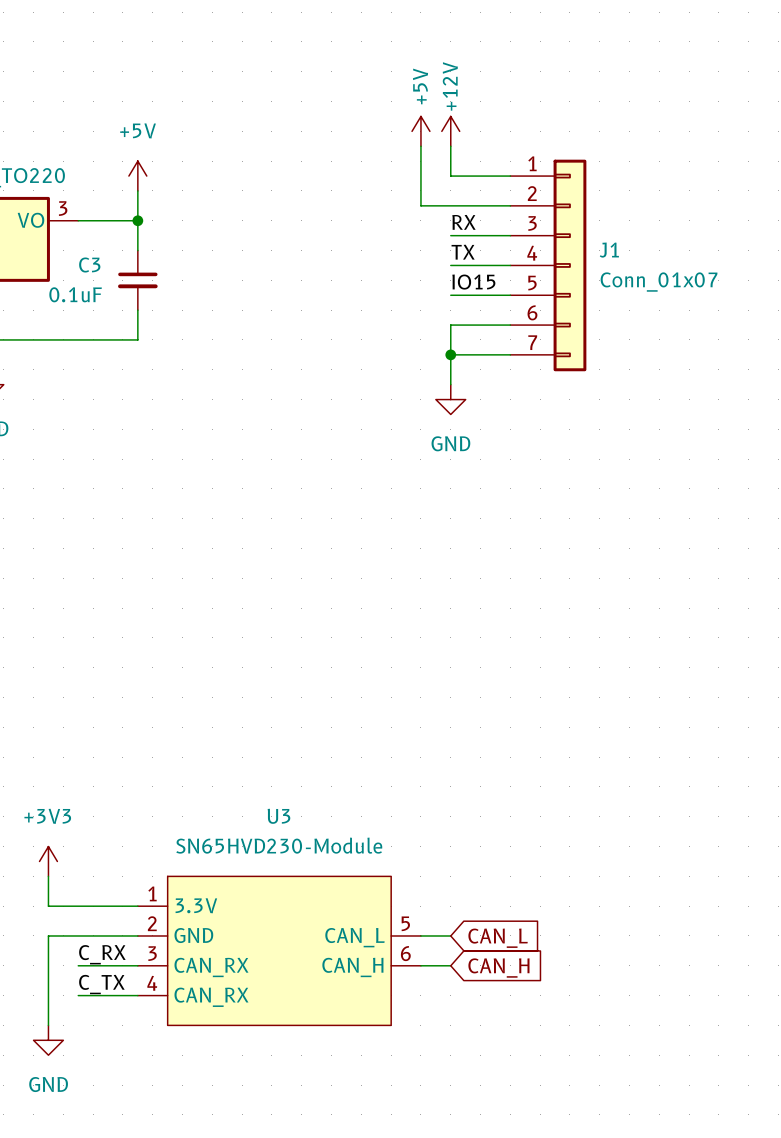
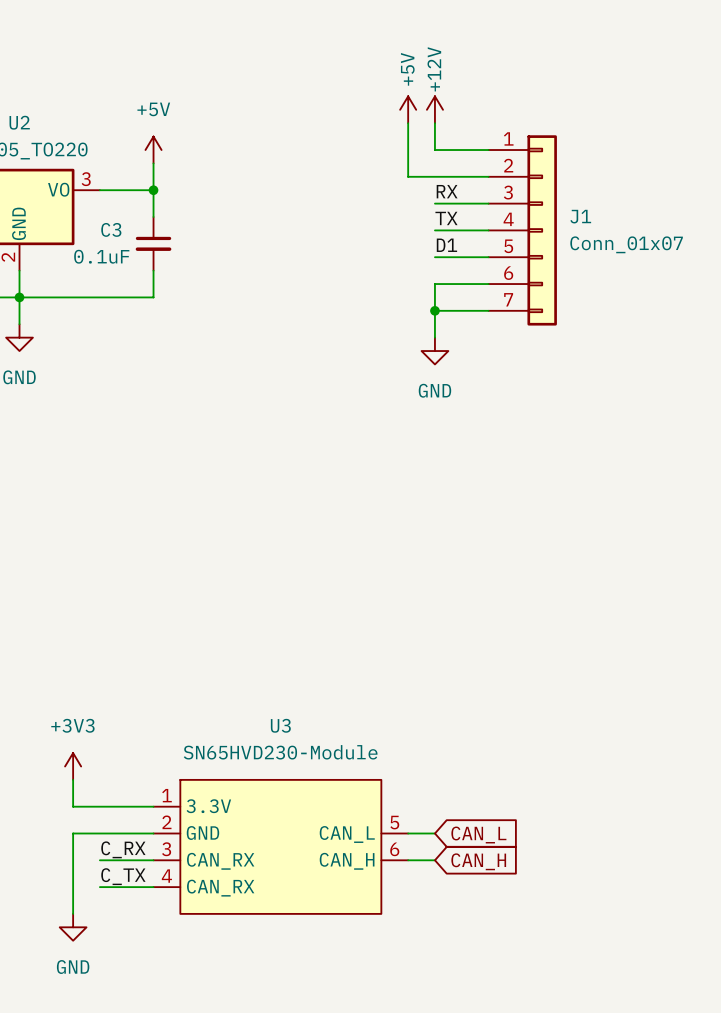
label: IO15 (473, 282) -> D1 (446, 245)

